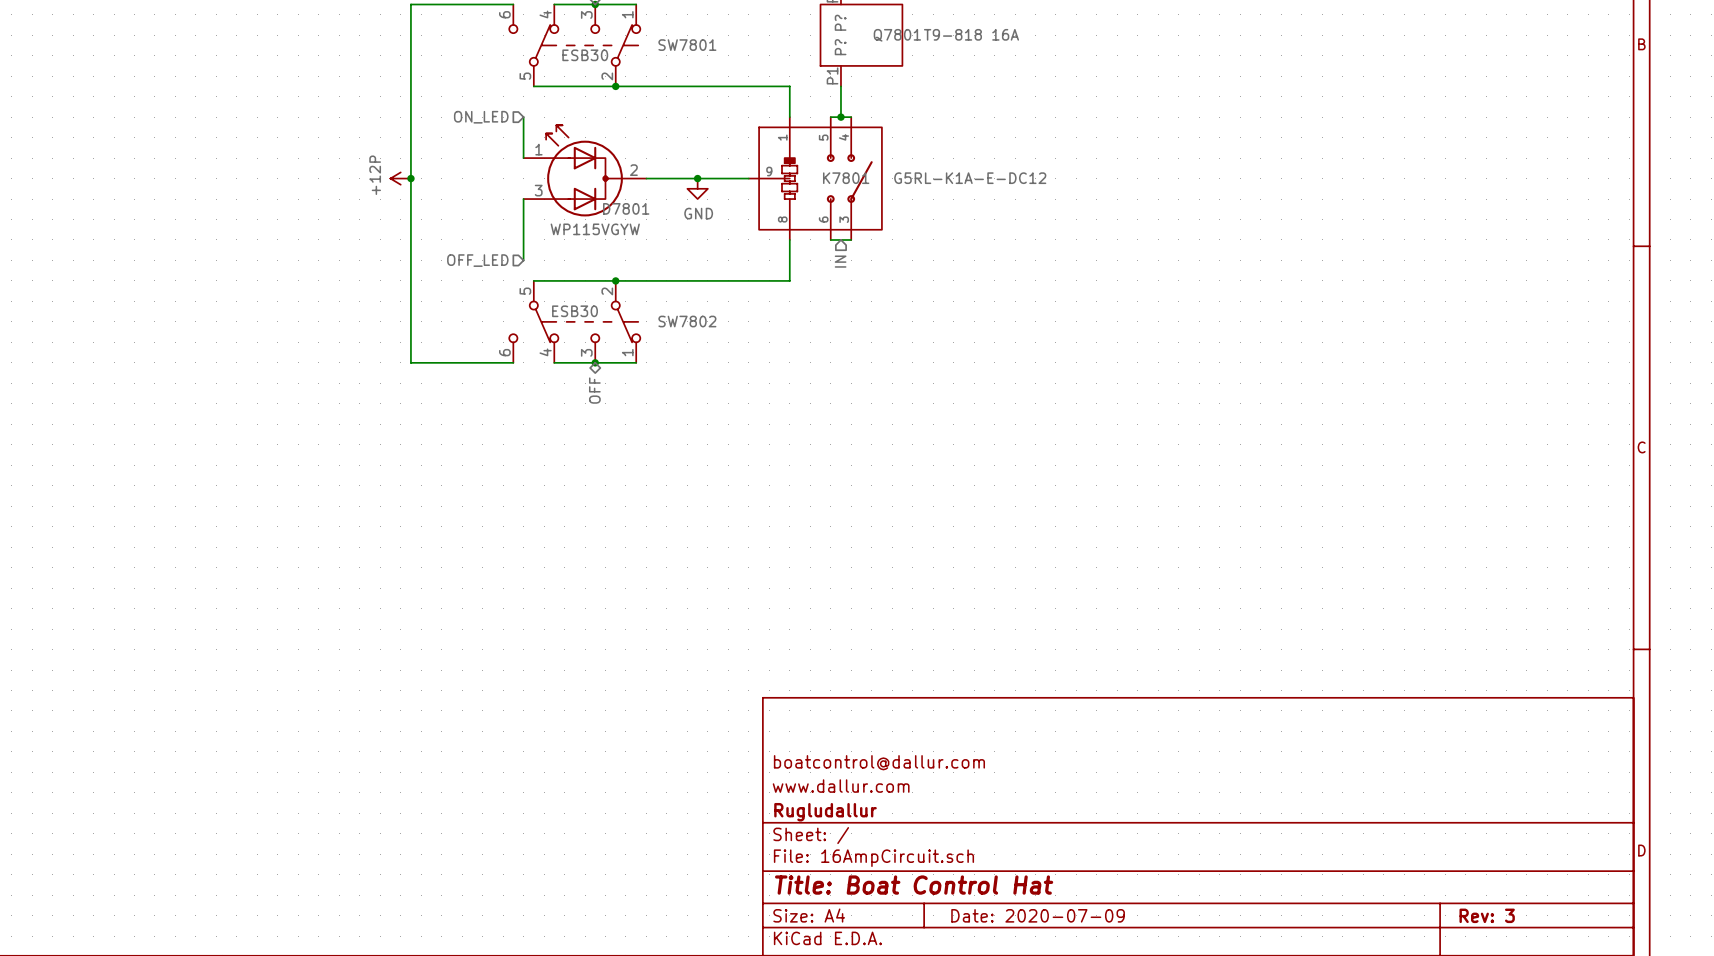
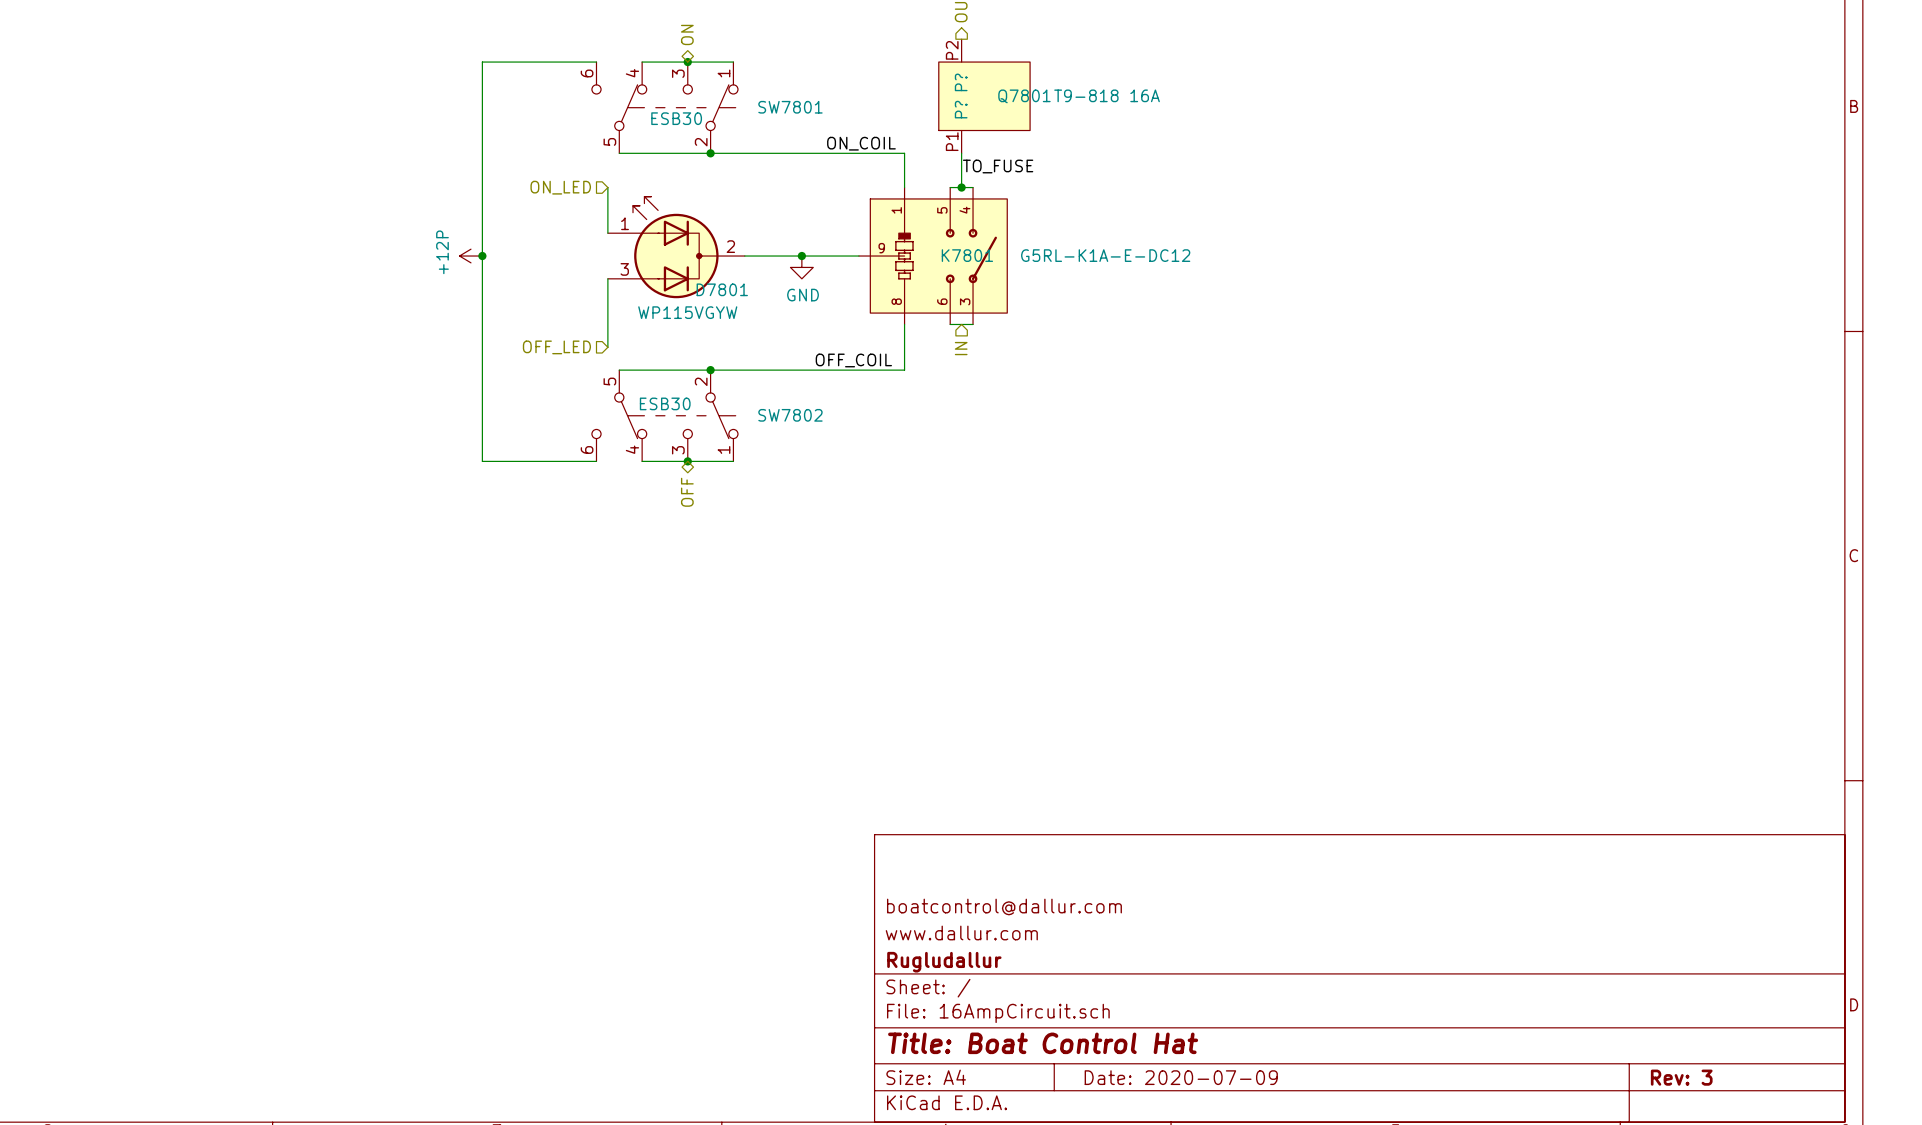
label: none -> ON_COIL (861, 143)
label: none -> TO_FUSE (998, 166)
label: none -> OFF_COIL (853, 360)

